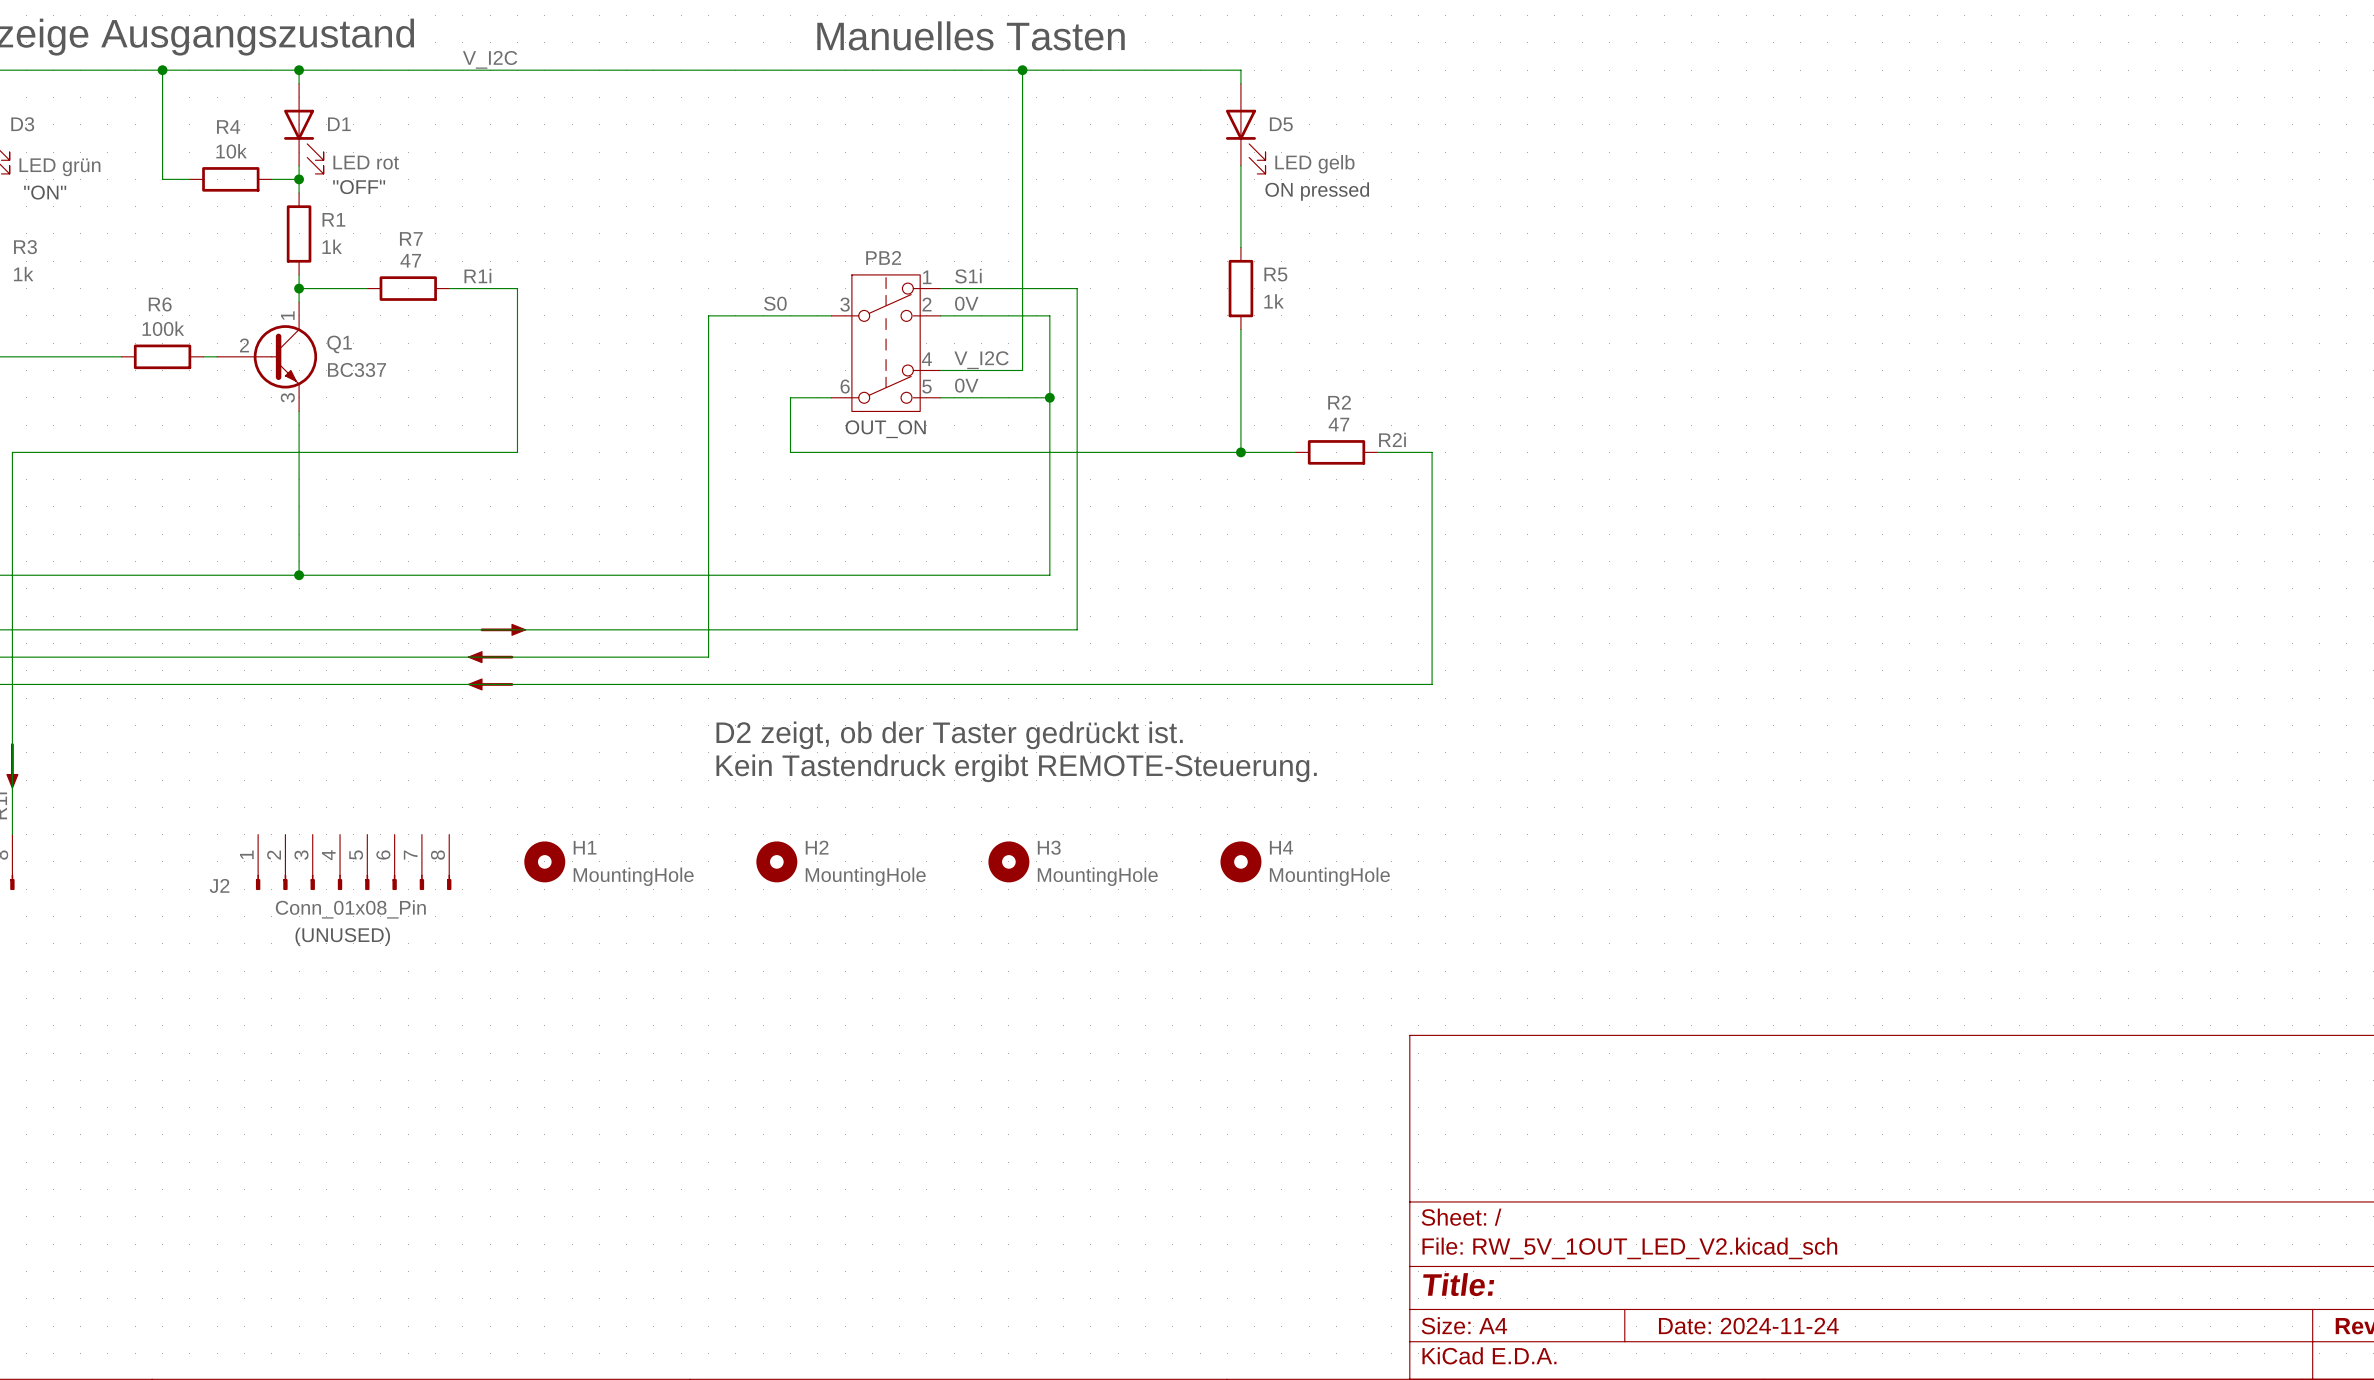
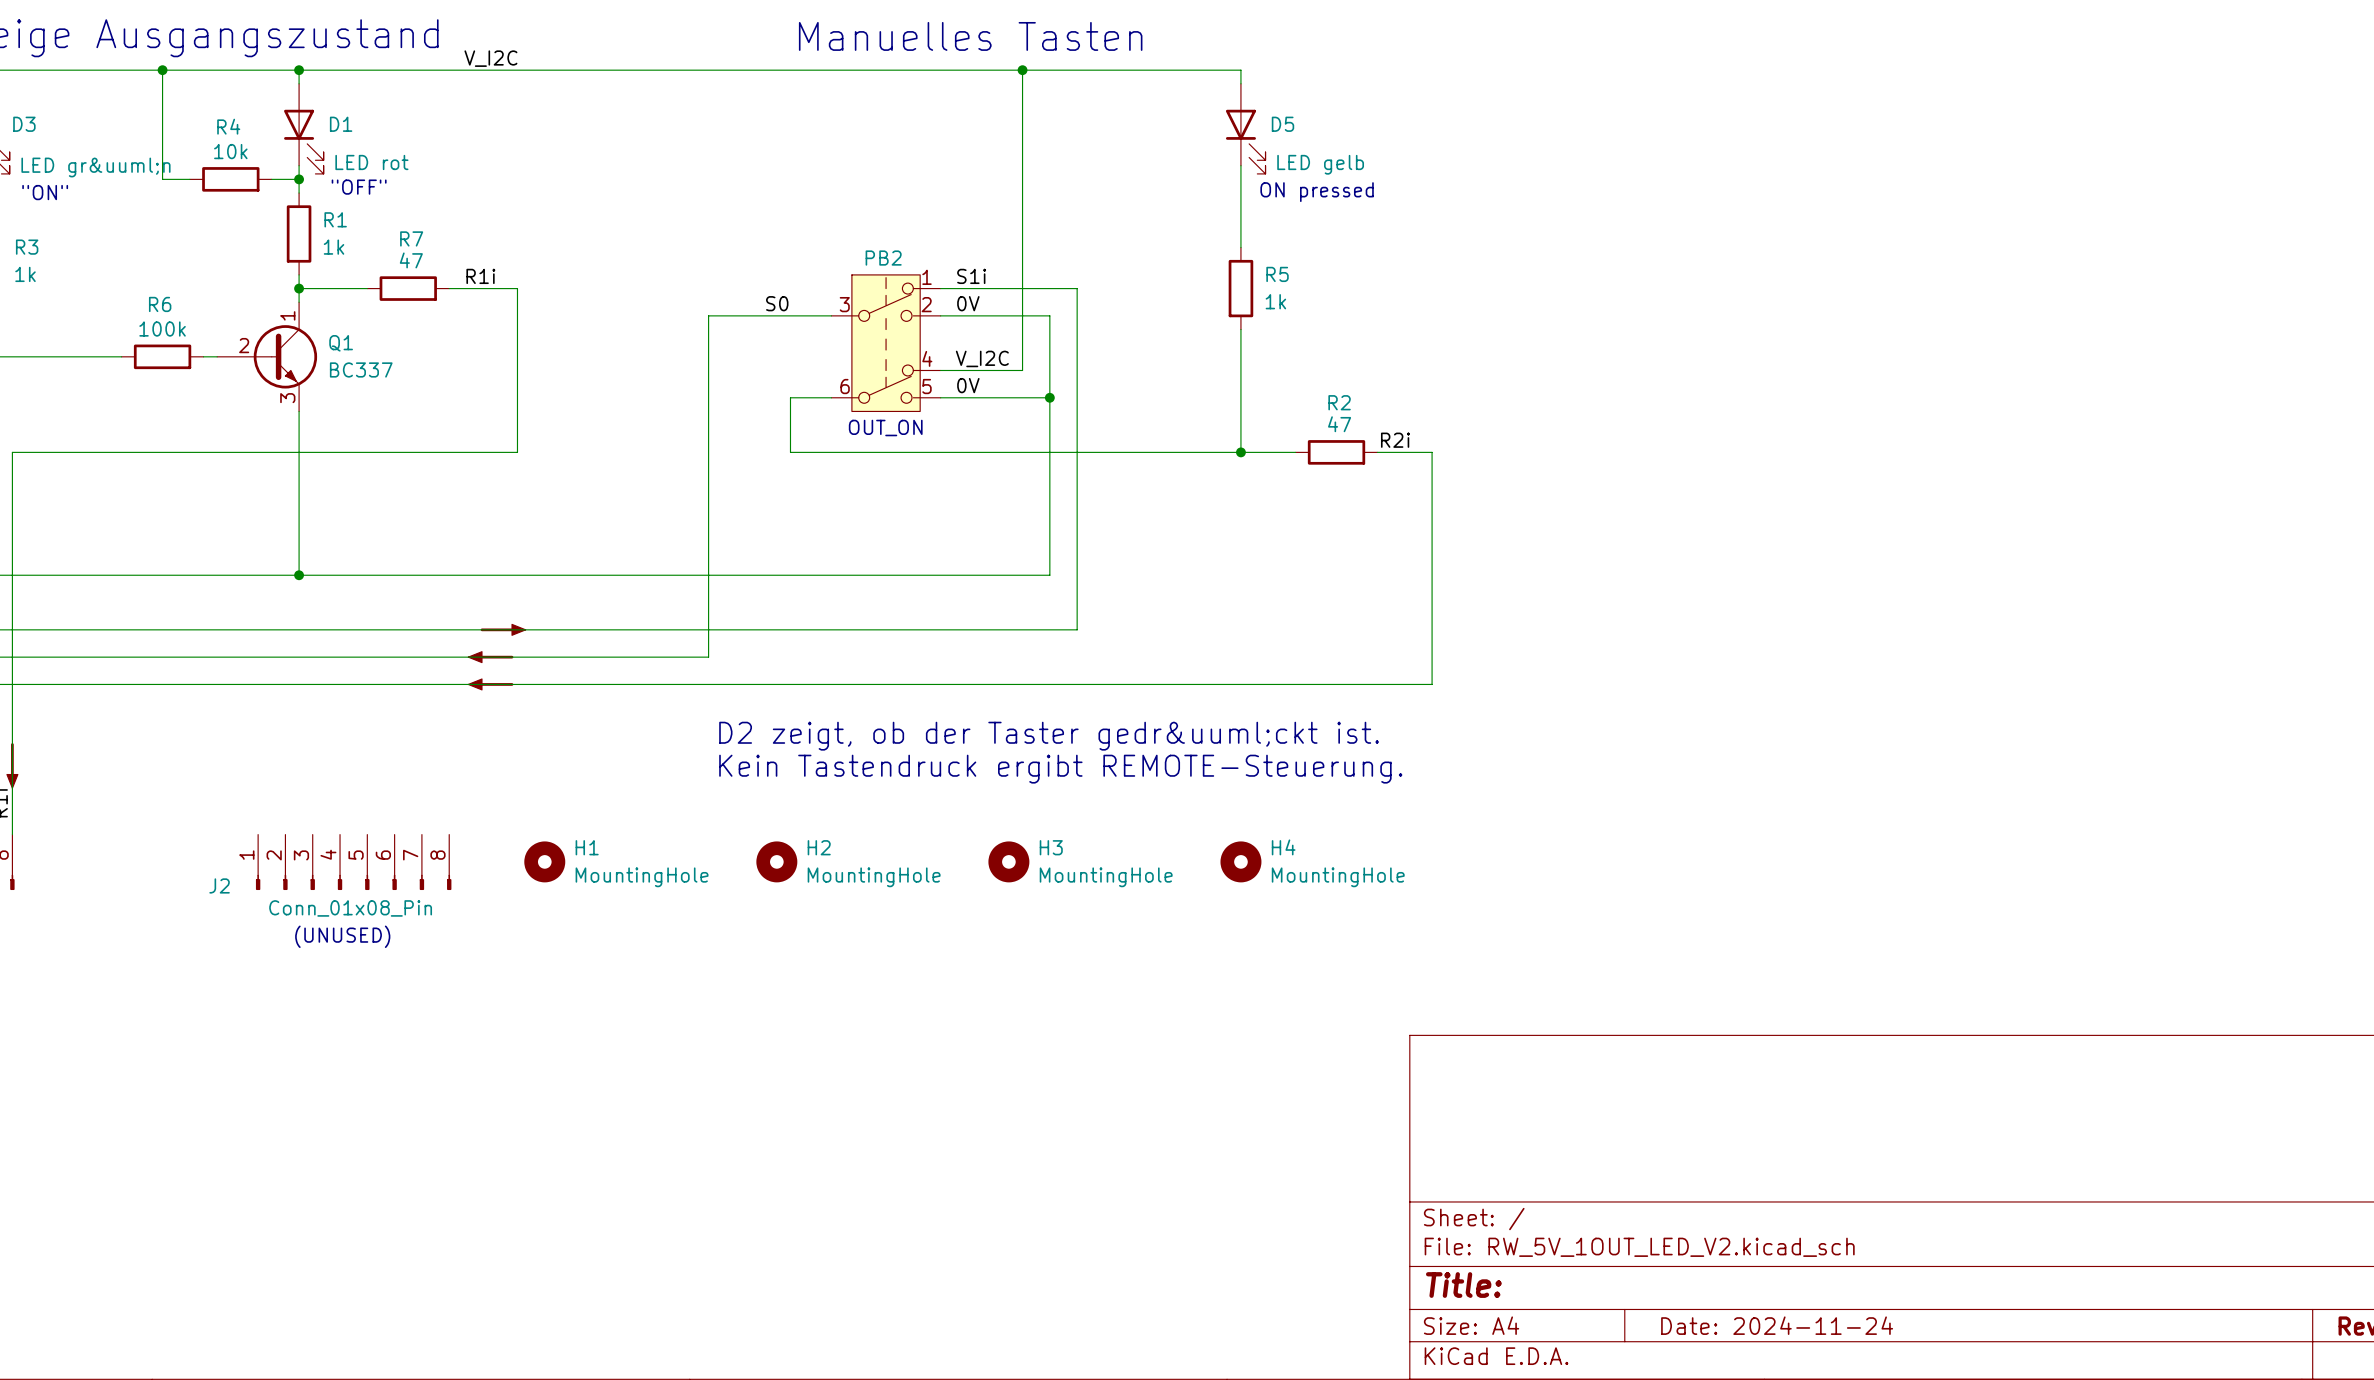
D3 value: LED grün (59, 167) -> LED gr&uuml;n (95, 167)
text: D2 zeigt, ob der Taster gedrückt ist. (949, 735) -> D2 zeigt, ob der Taster gedr&uuml;ckt ist. (1049, 736)

